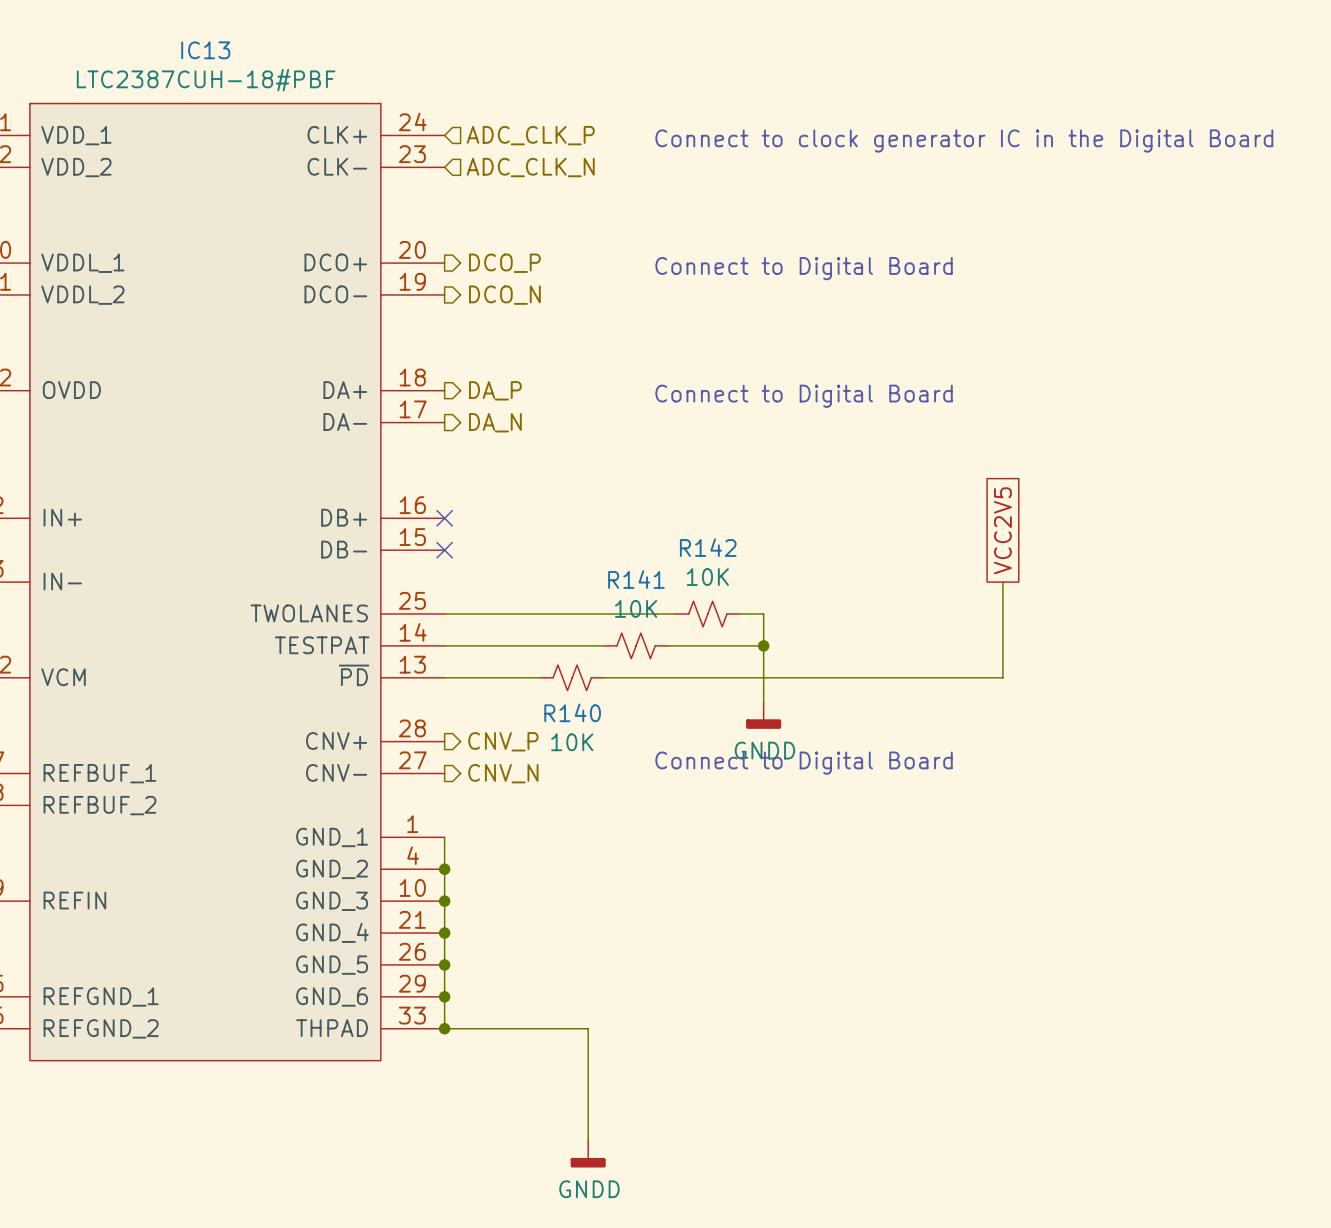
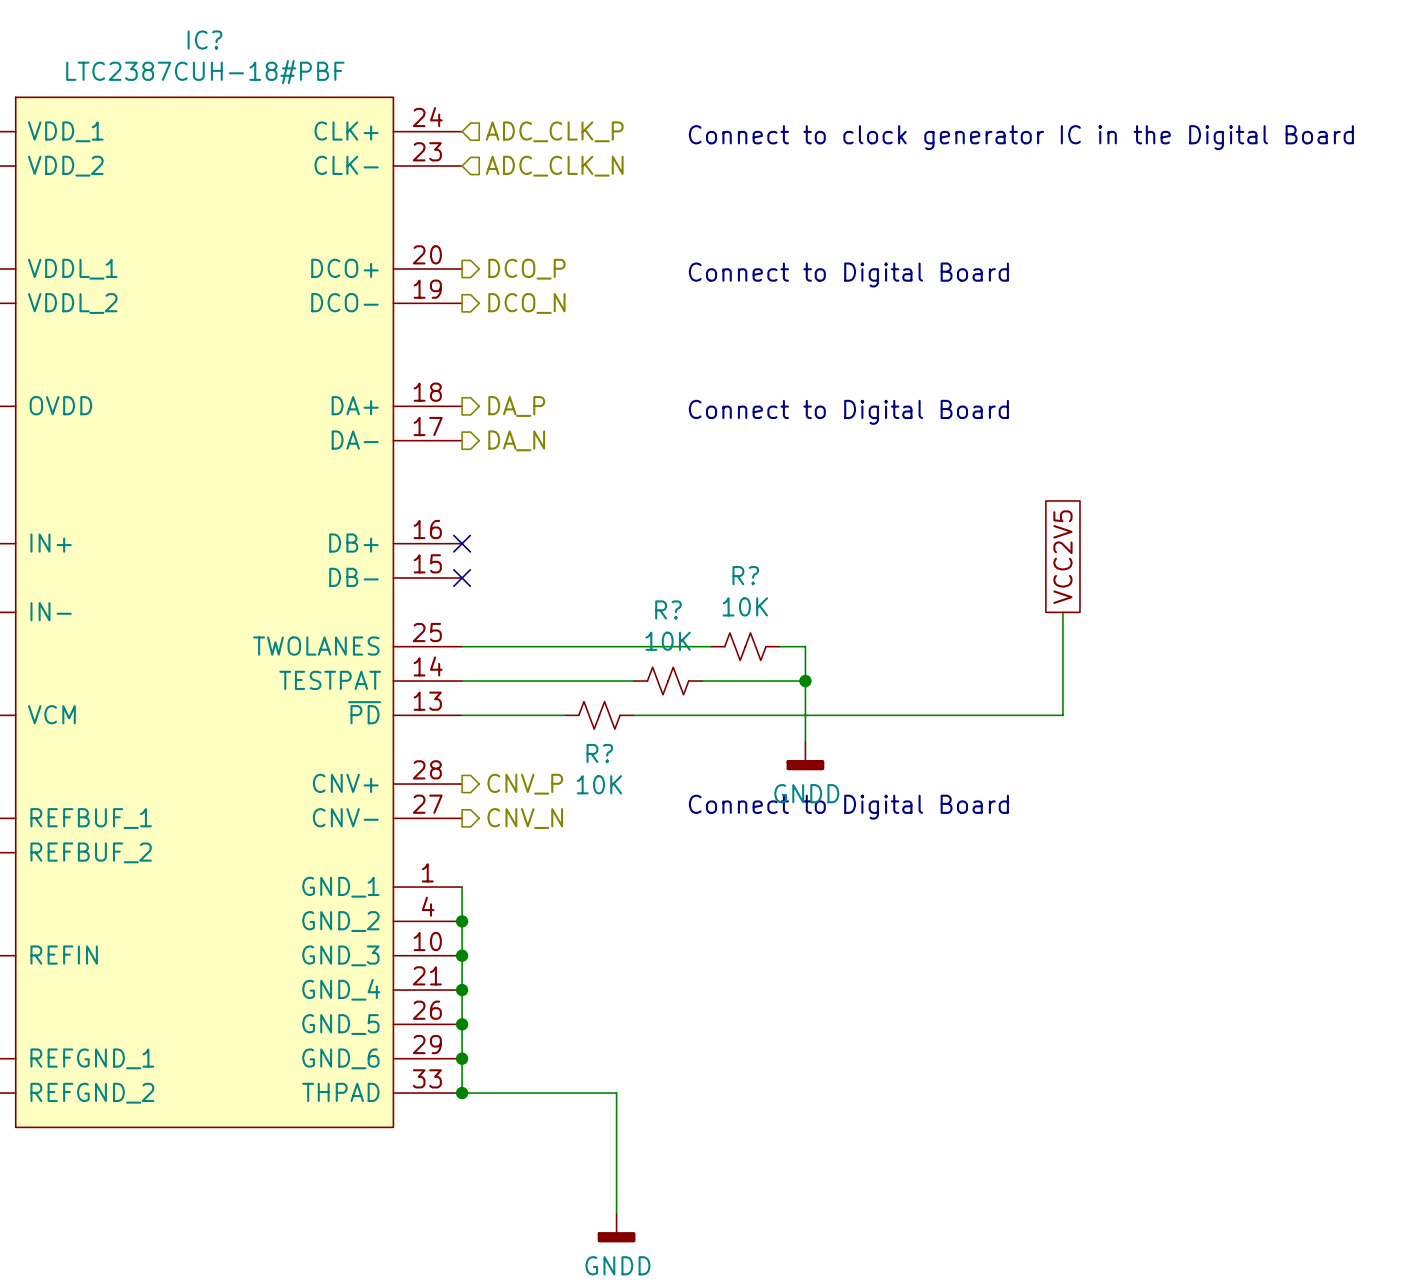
IC13 name: IC13 (205, 50) -> IC? (204, 40)
R142 name: R142 (708, 547) -> R? (745, 575)
R141 name: R141 (636, 579) -> R? (668, 609)
R140 name: R140 (572, 712) -> R? (599, 753)

